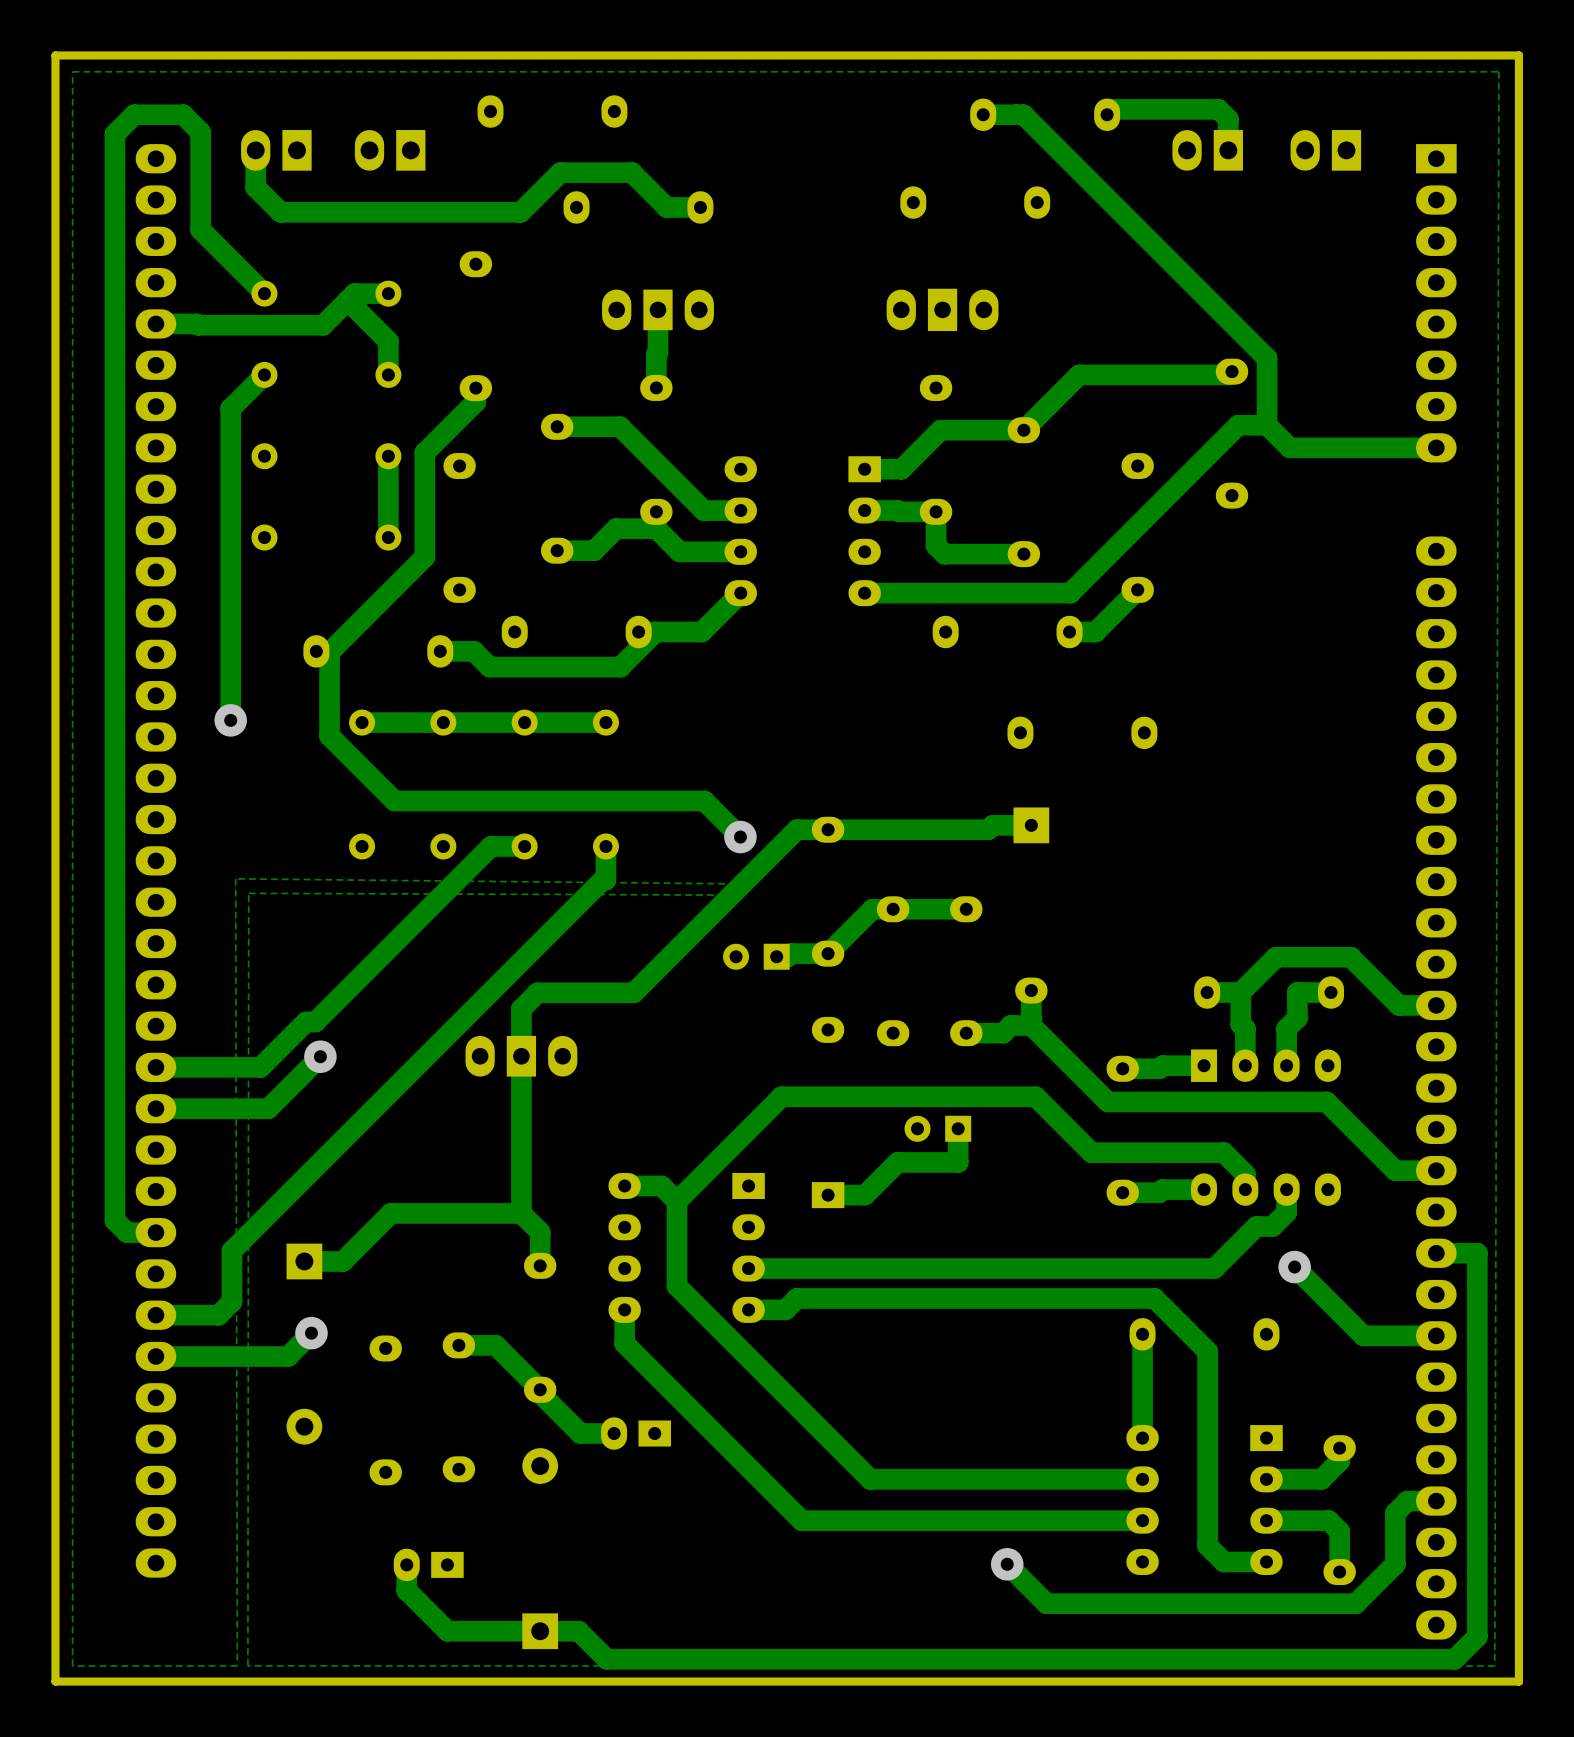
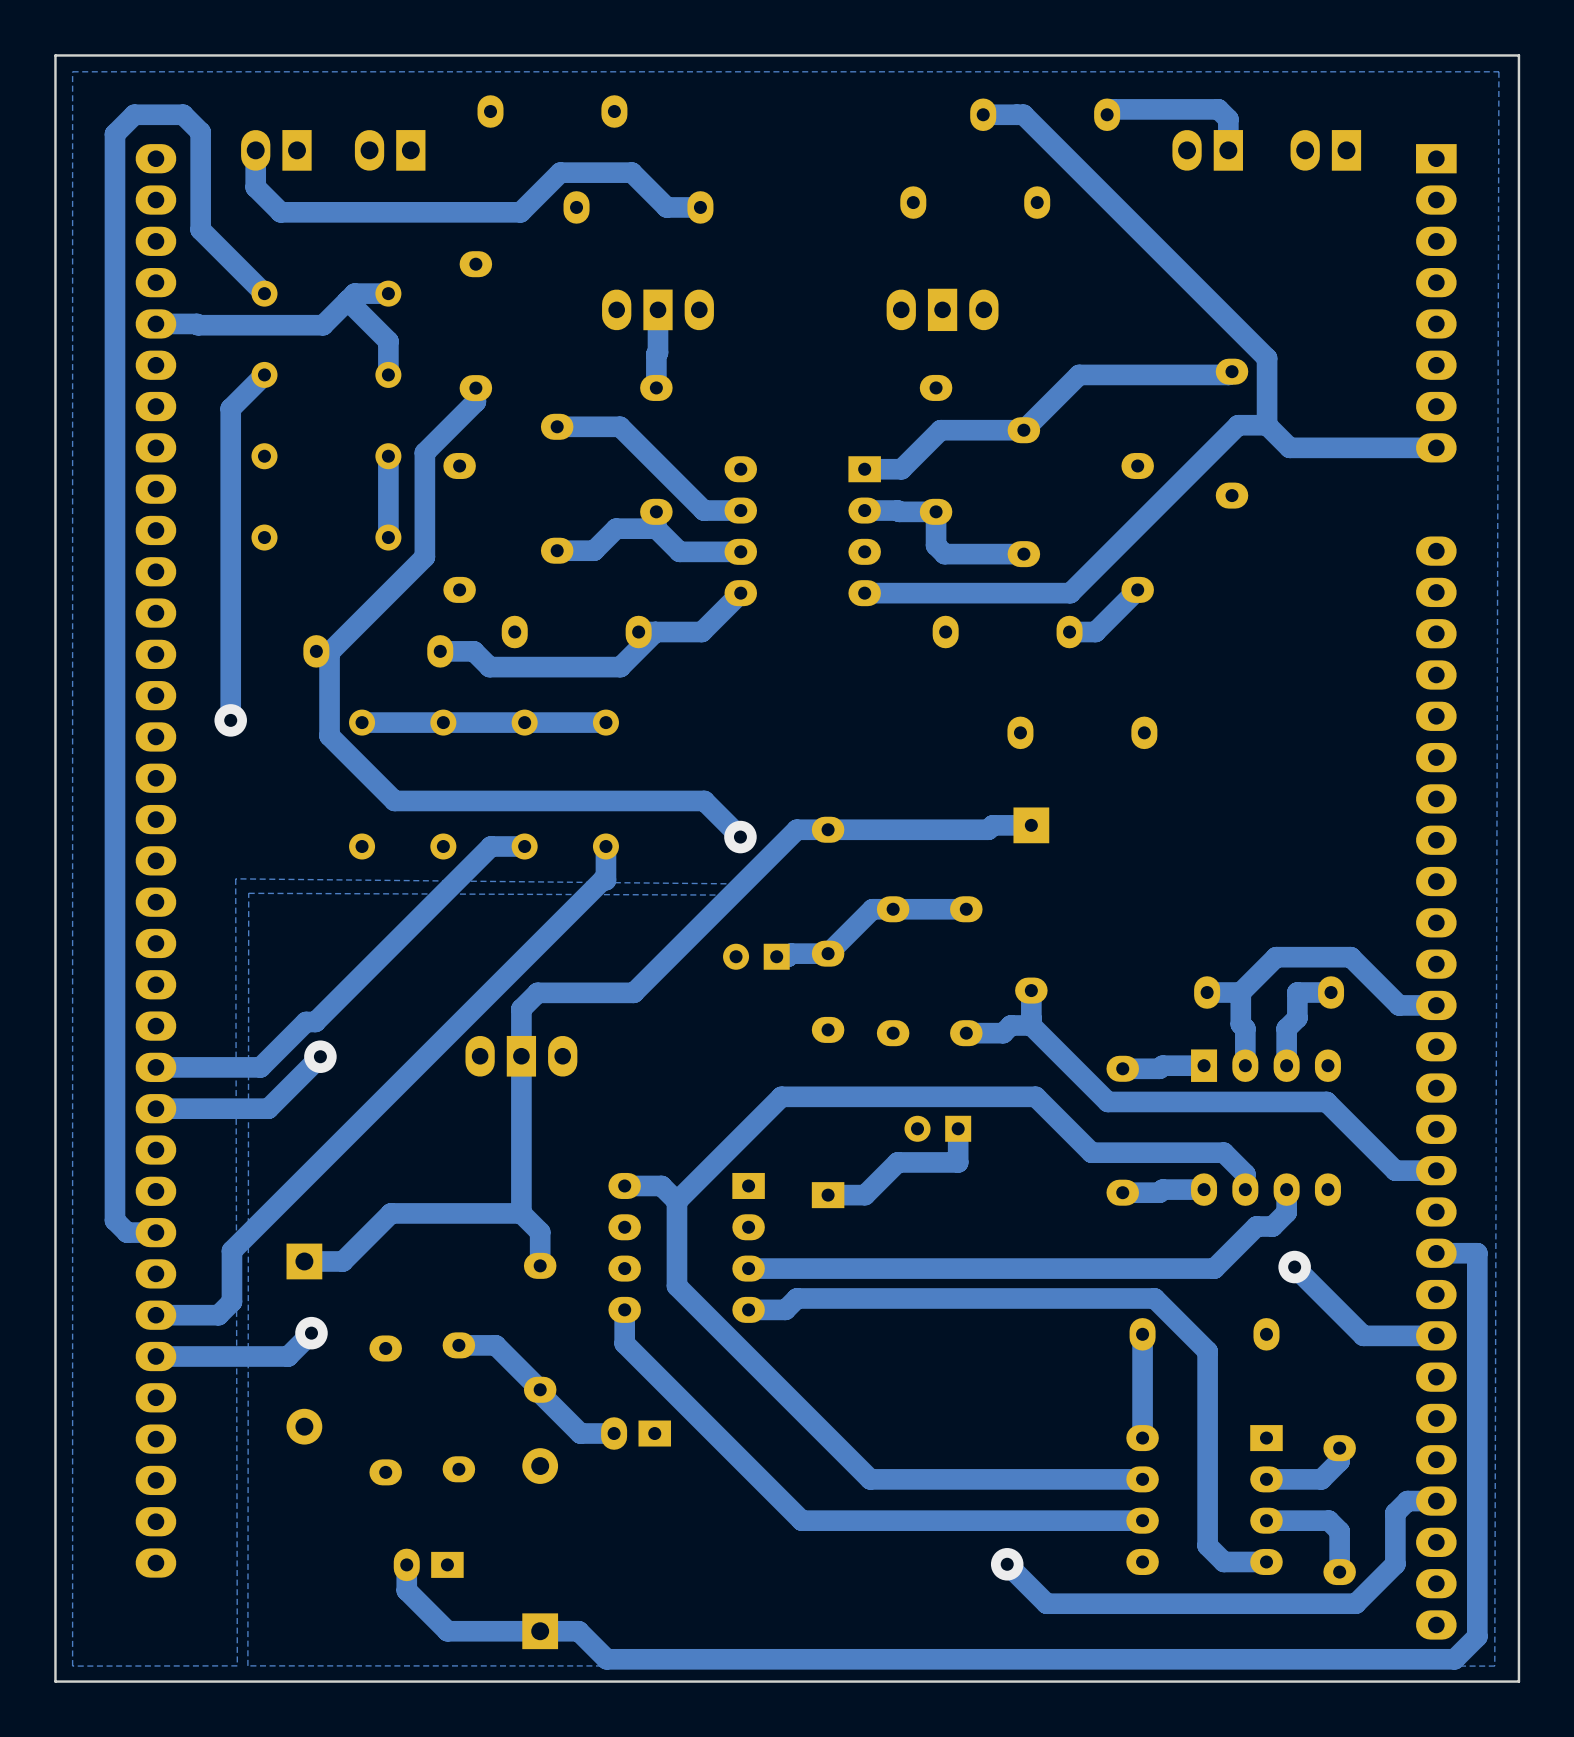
board edge width: thick (1518, 55) (1518, 1681) (55, 1681) (55, 55) (1518, 55) -> thin (1518, 55) (1518, 1681) (55, 1681) (55, 55) (1518, 55)

